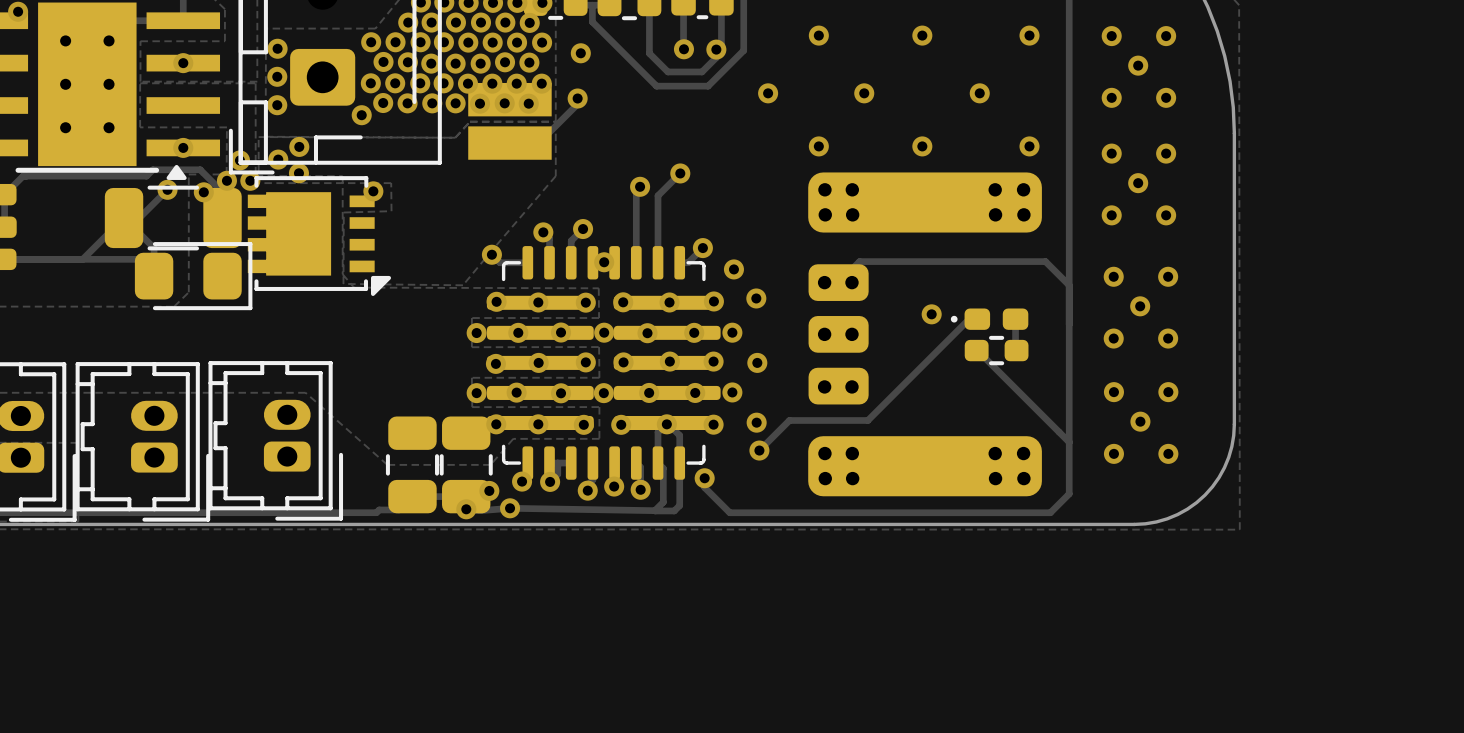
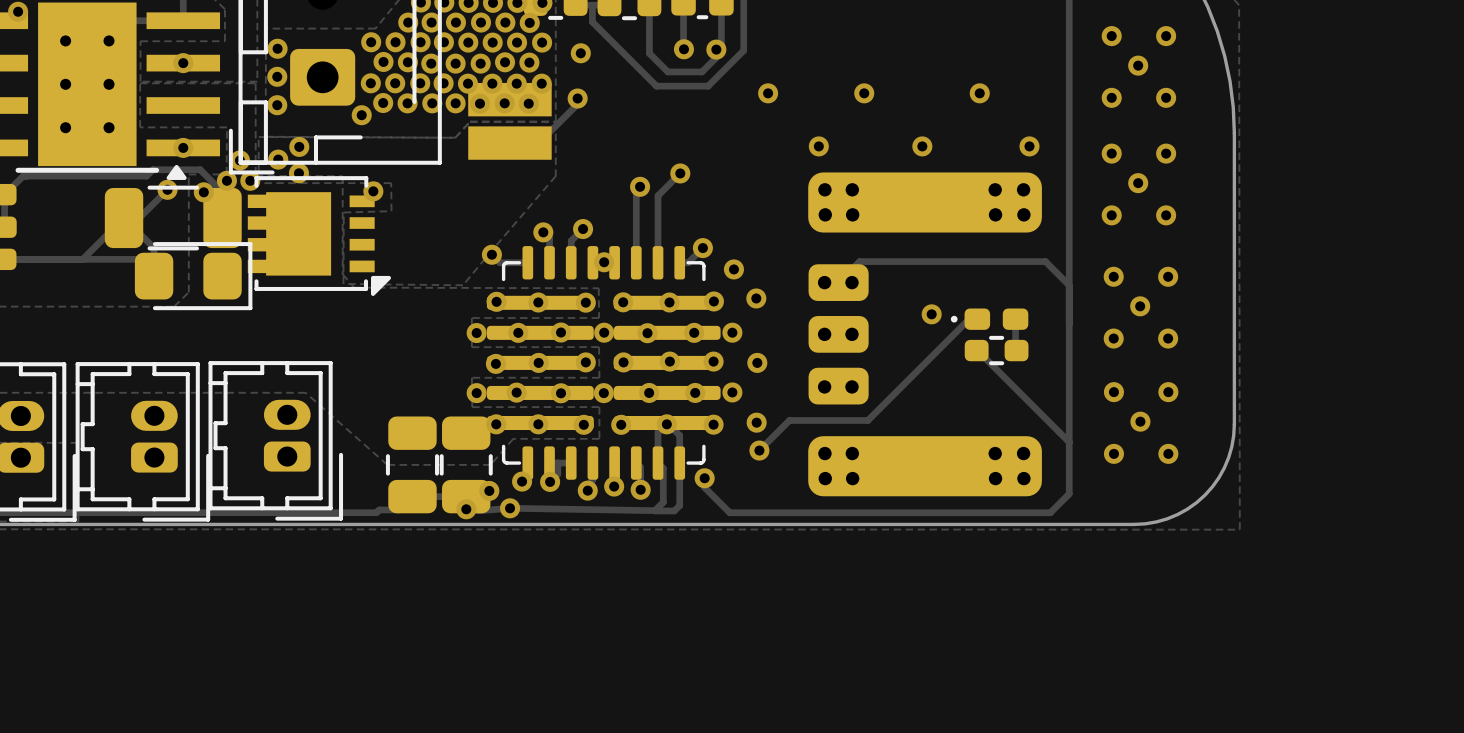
via: (818, 35) -> none
via: (922, 35) -> none
via: (1029, 35) -> none

